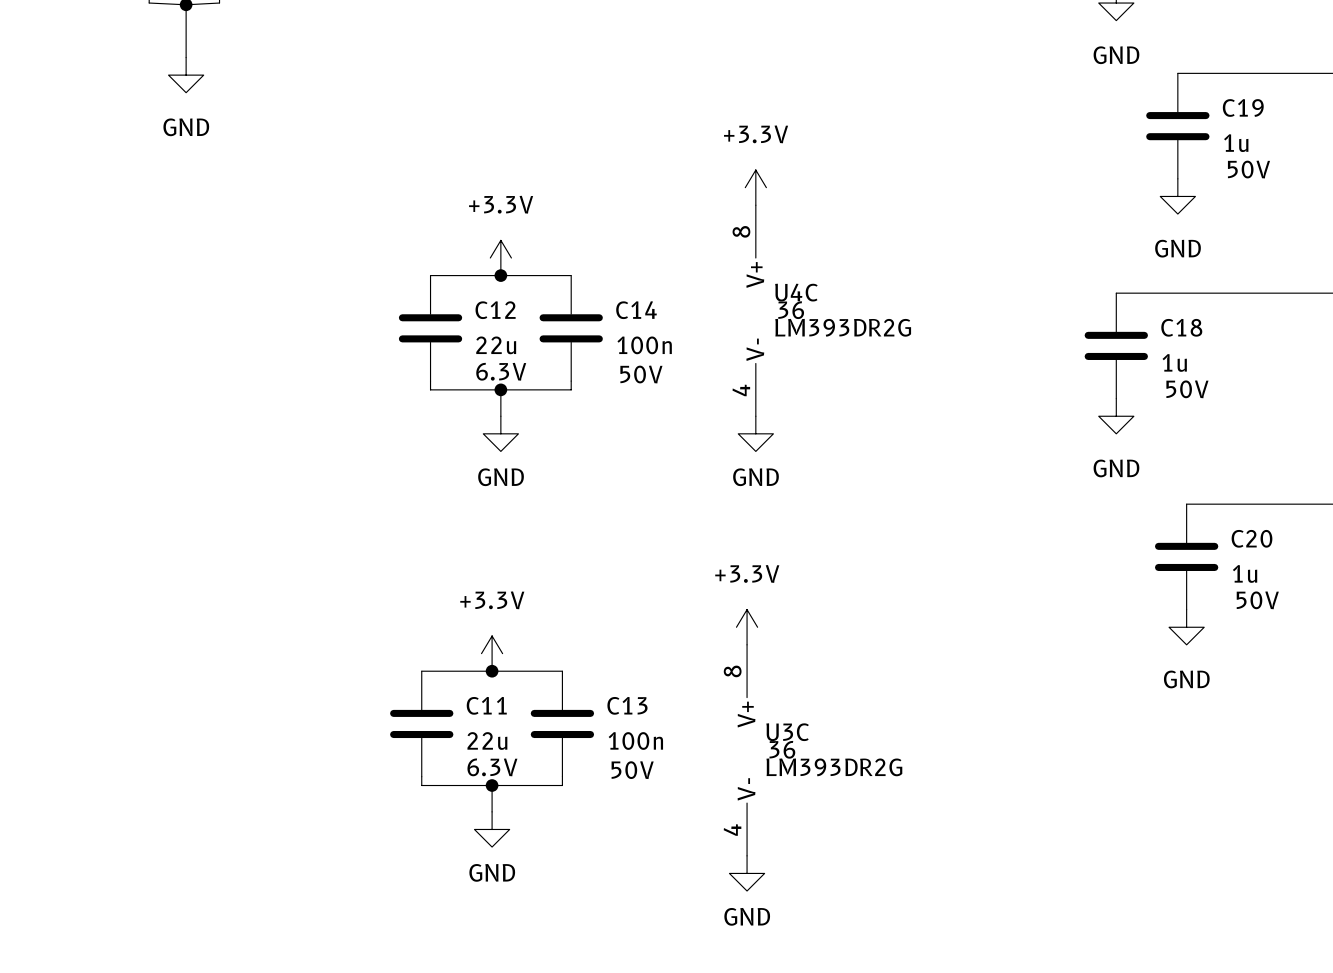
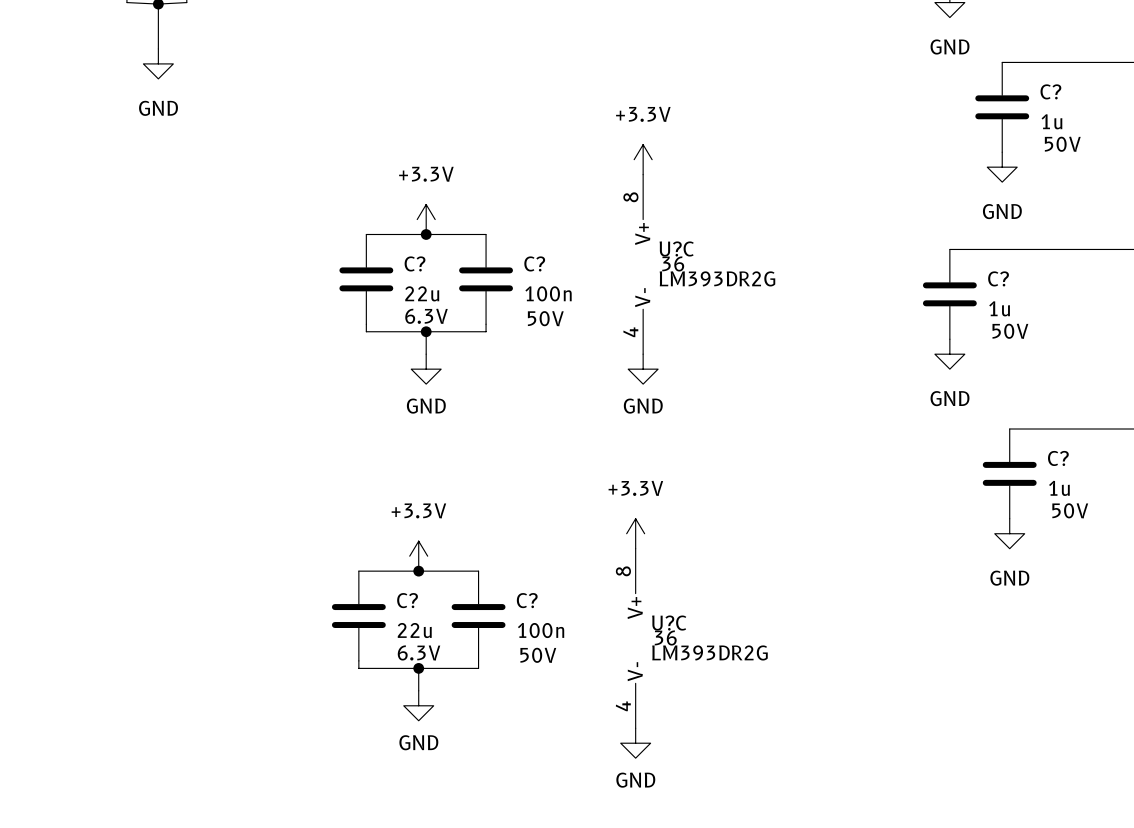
C19 name: C19 (1243, 107) -> C? (1050, 91)
U4C name: U4C (796, 292) -> U?C (676, 248)
C12 name: C12 (495, 310) -> C? (415, 263)
C14 name: C14 (636, 310) -> C? (534, 263)
C18 name: C18 (1181, 327) -> C? (998, 278)
C20 name: C20 (1251, 538) -> C? (1058, 458)
C11 name: C11 (486, 705) -> C? (407, 600)
C13 name: C13 (627, 705) -> C? (527, 600)
U3C name: U3C (787, 732) -> U?C (669, 623)

